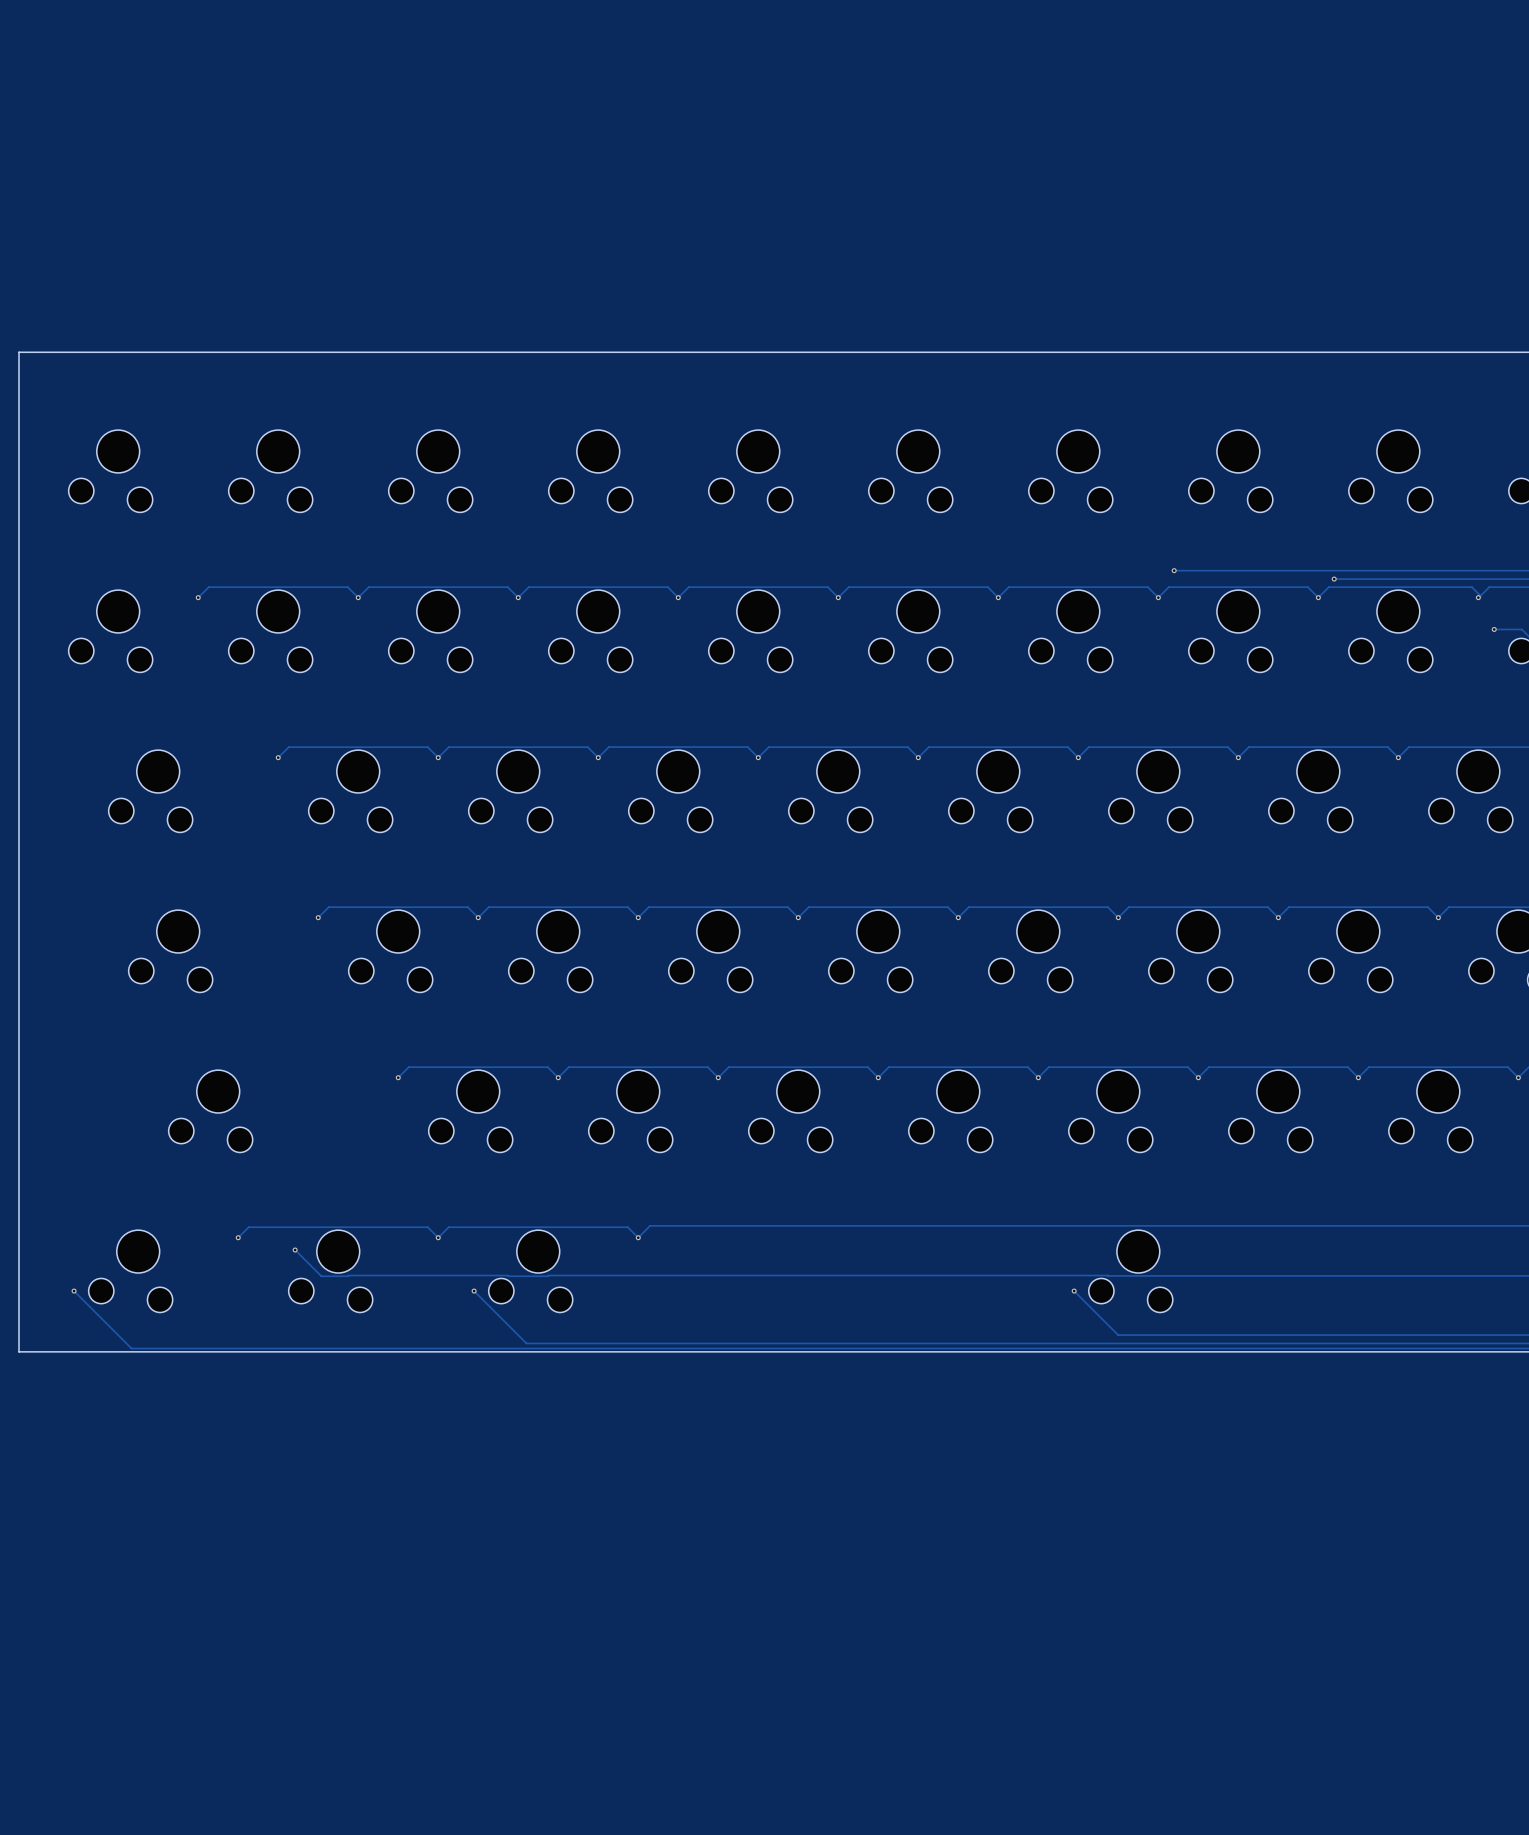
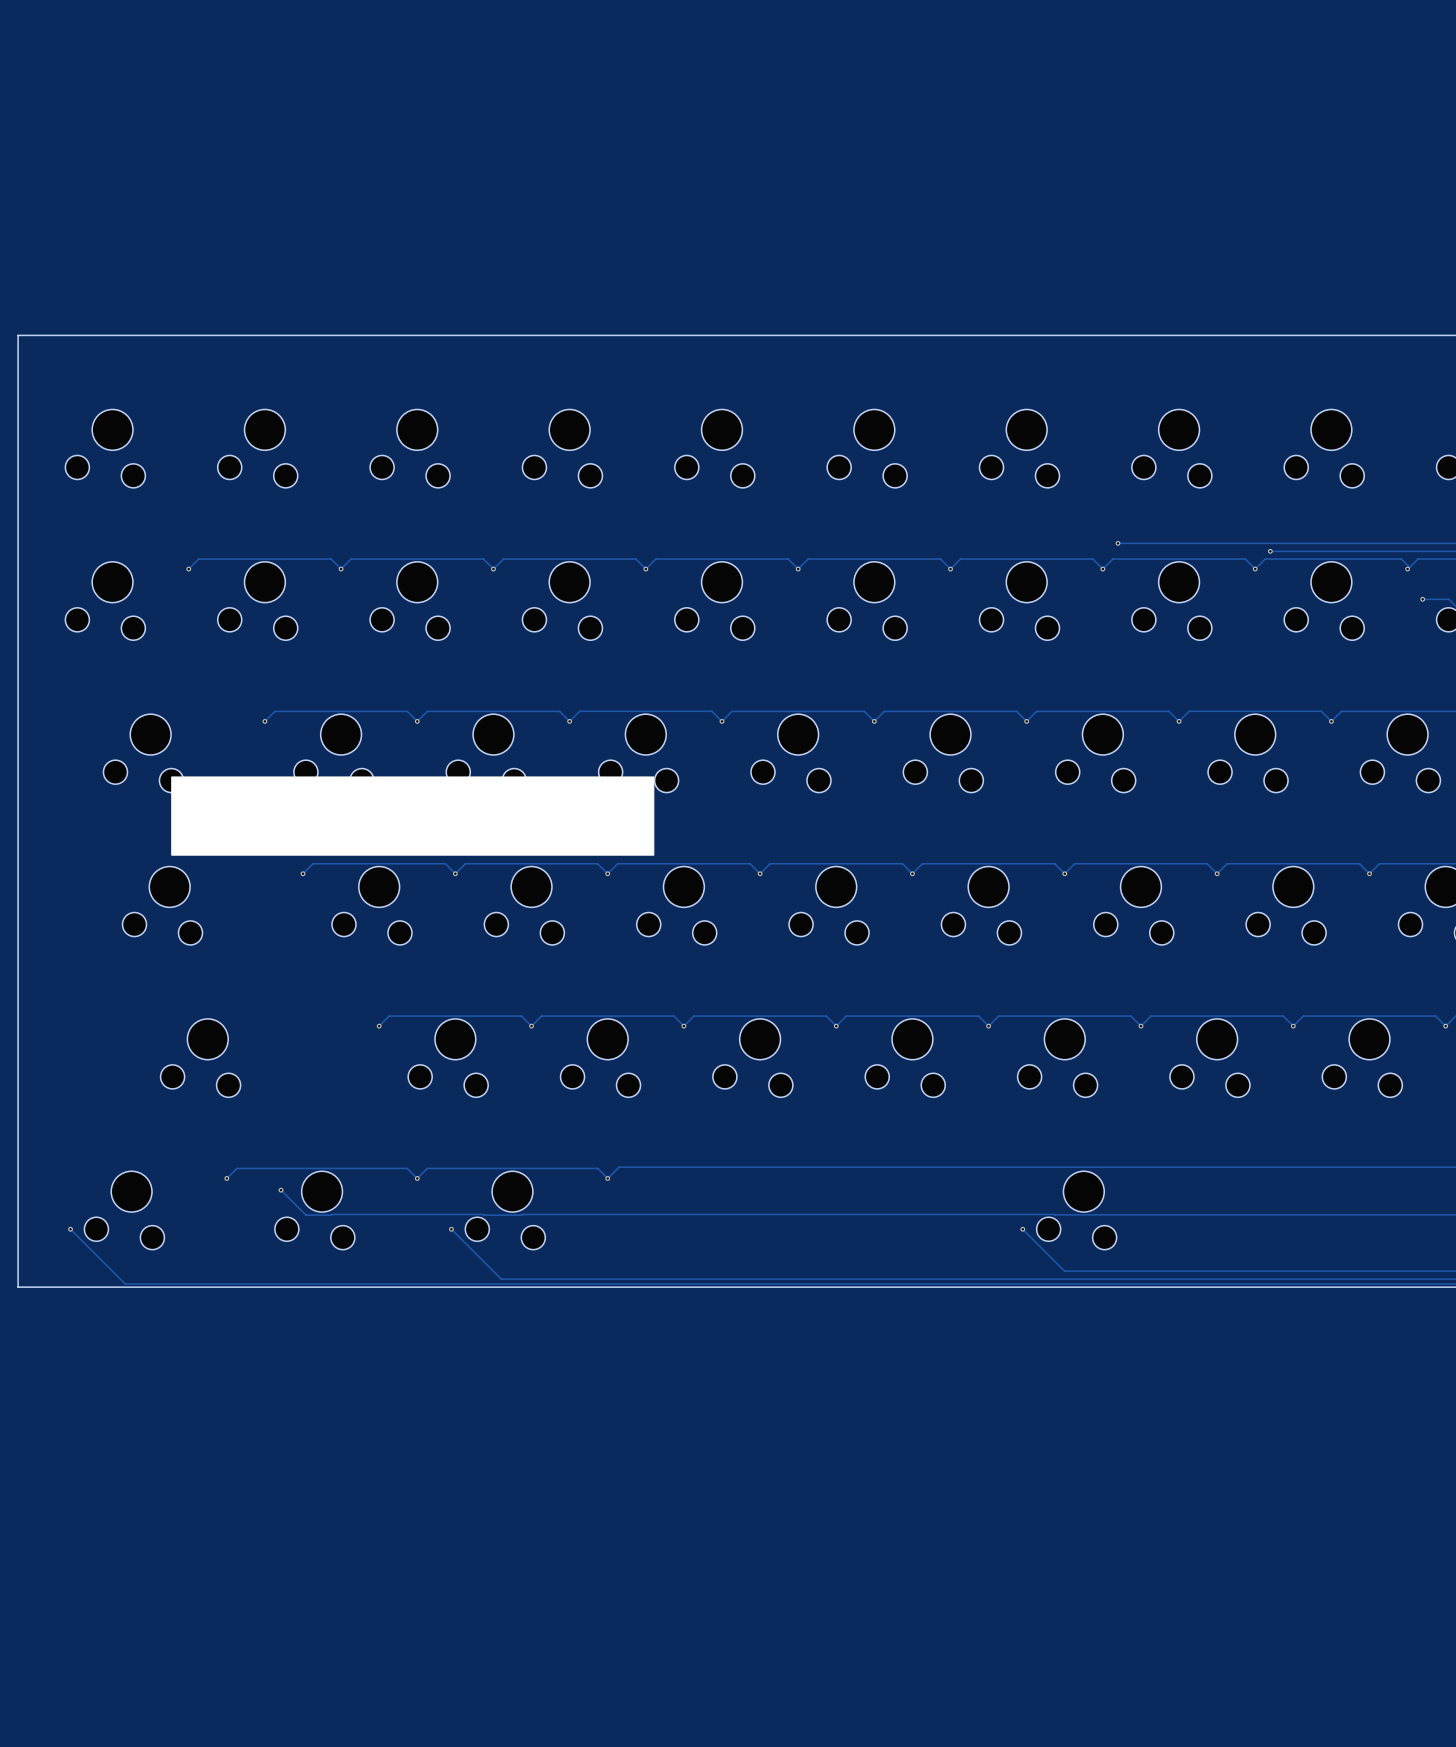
drawing: none -> [171, 776, 655, 856]

